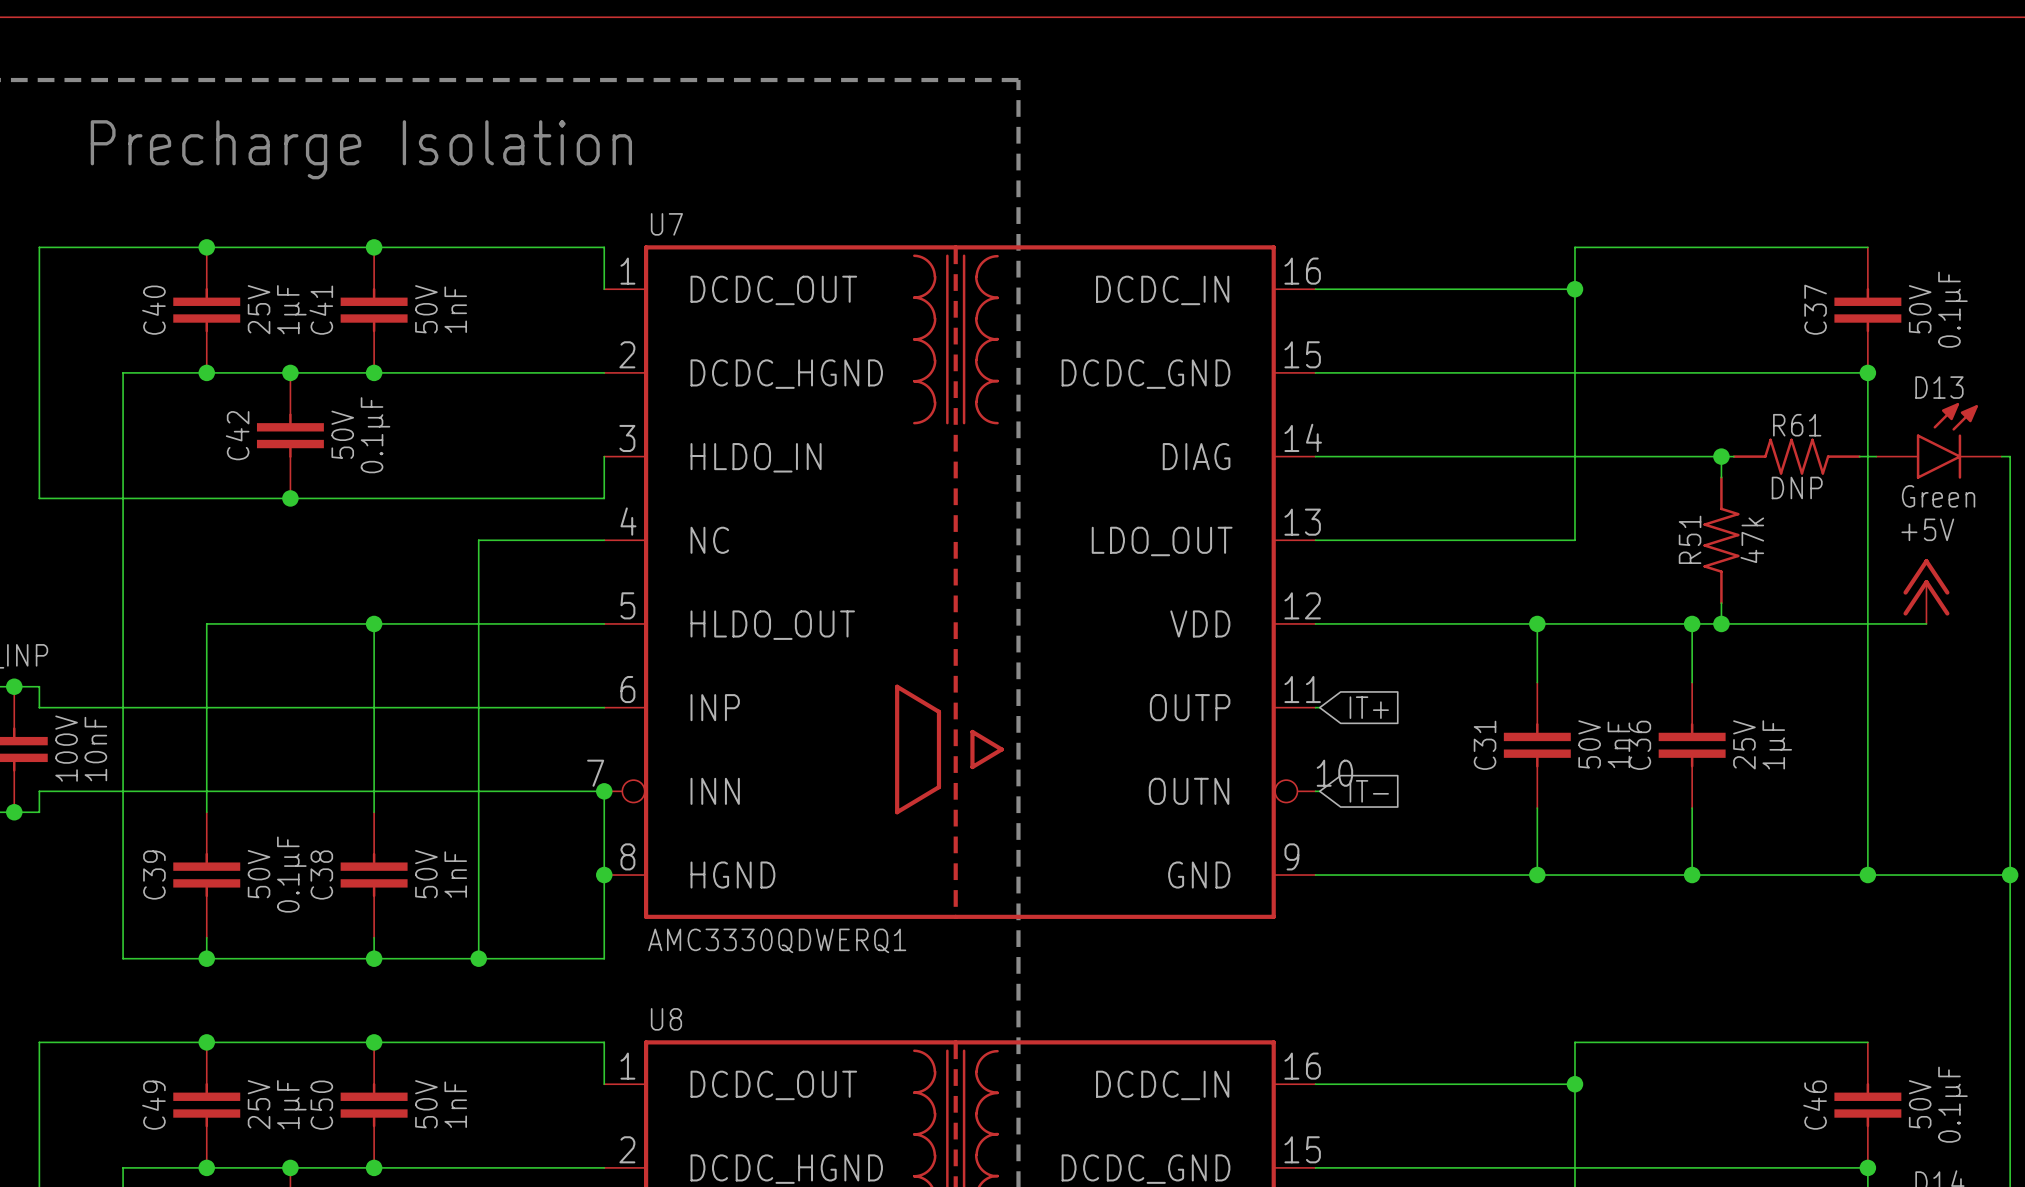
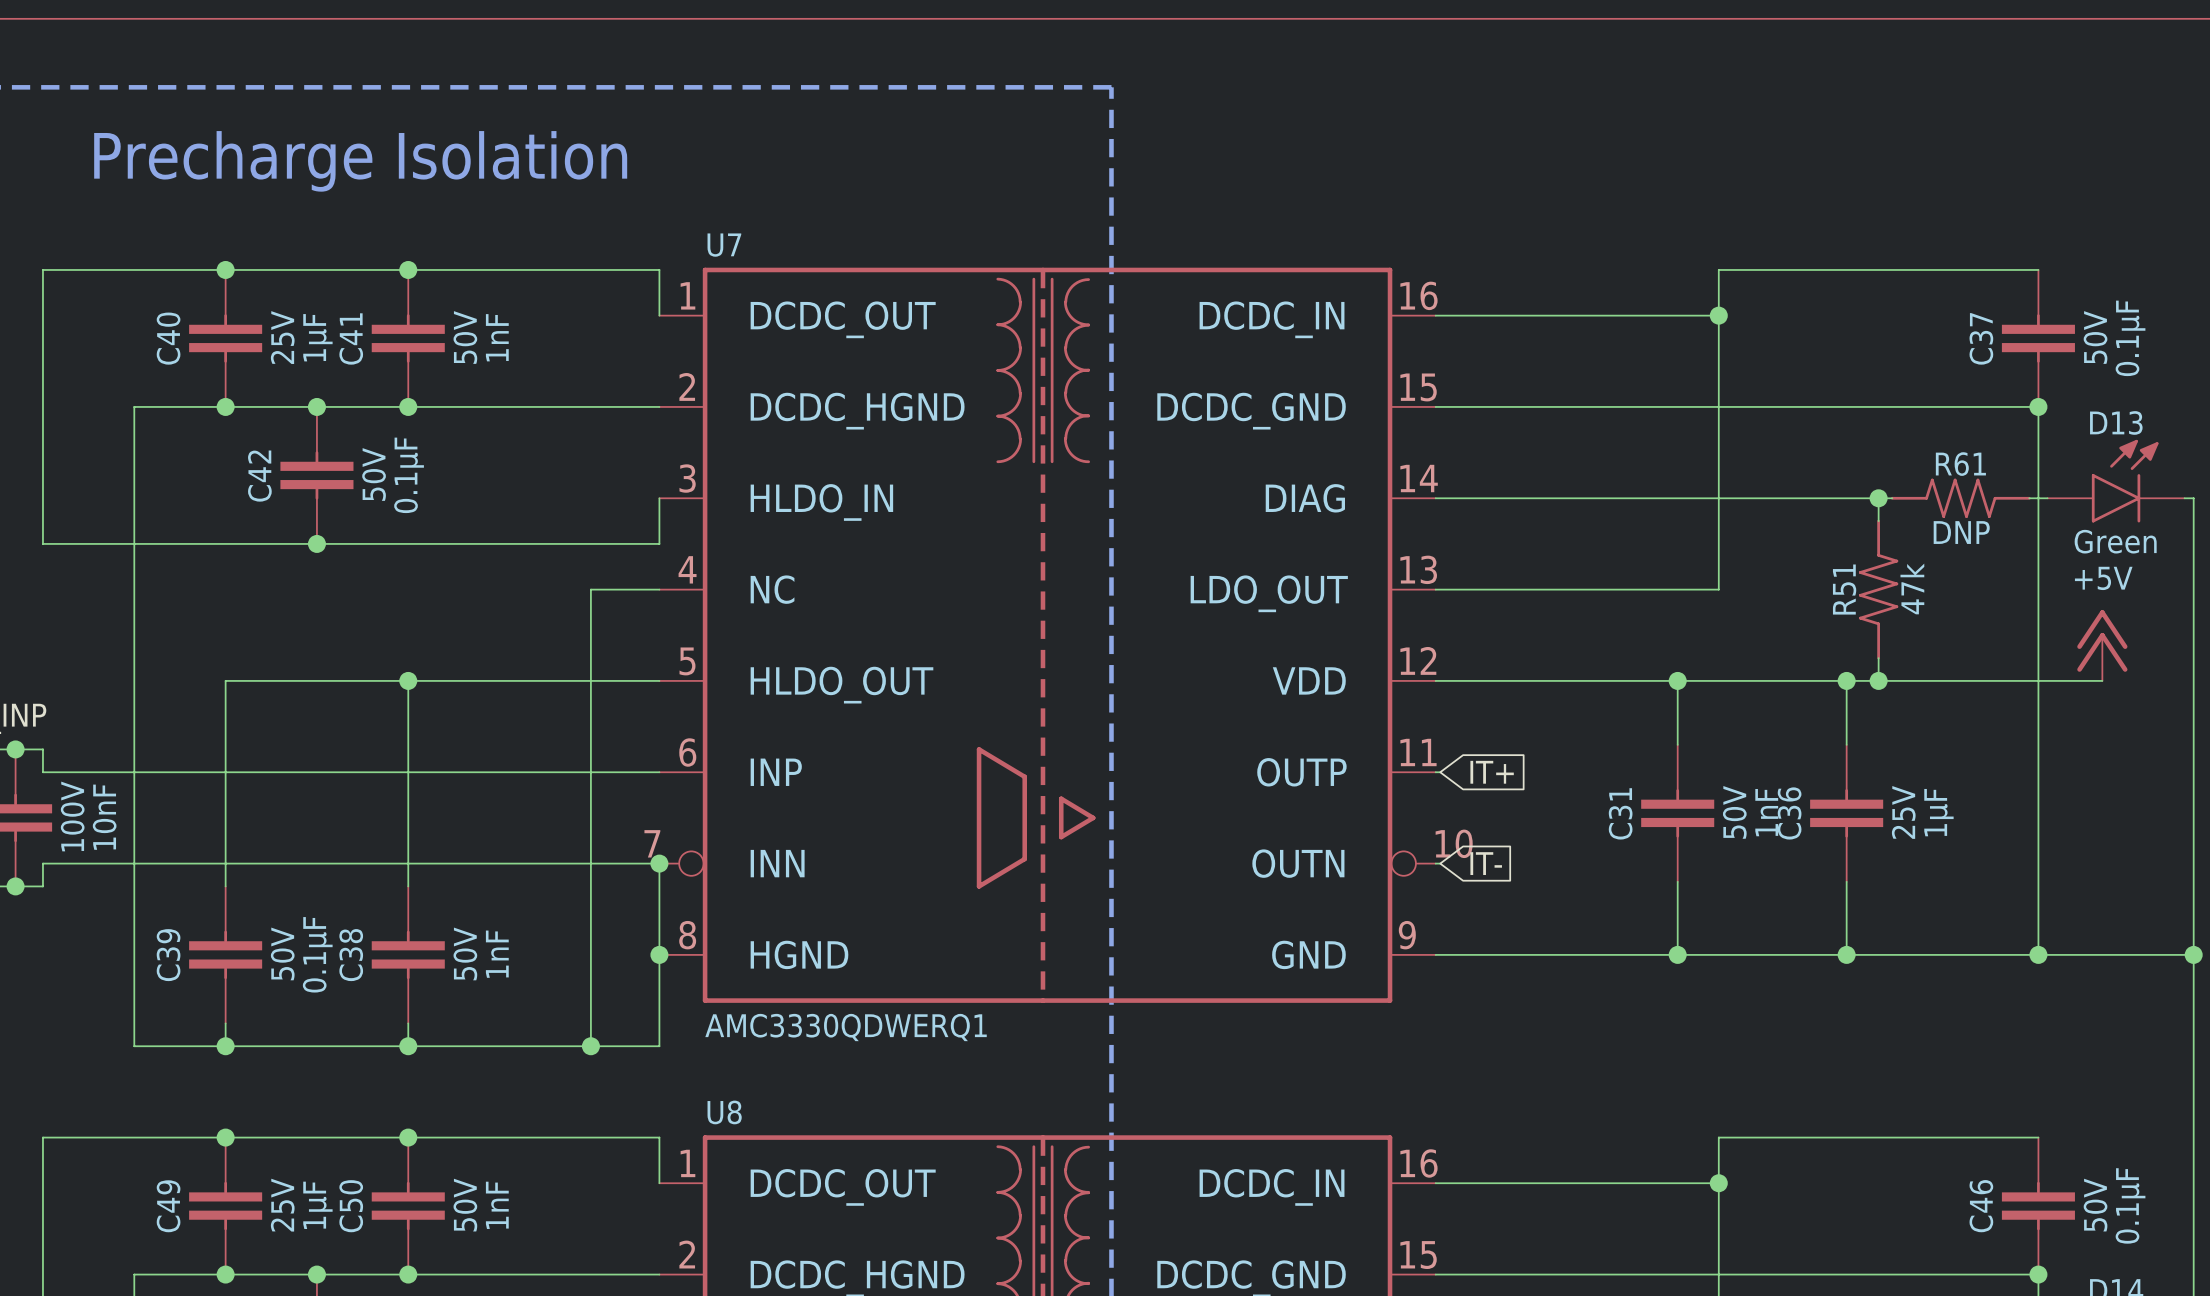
wire: (541, 540) (478, 540) (478, 958) -> (590, 589) (590, 1046)
junction position: (478, 958) -> (590, 1046)

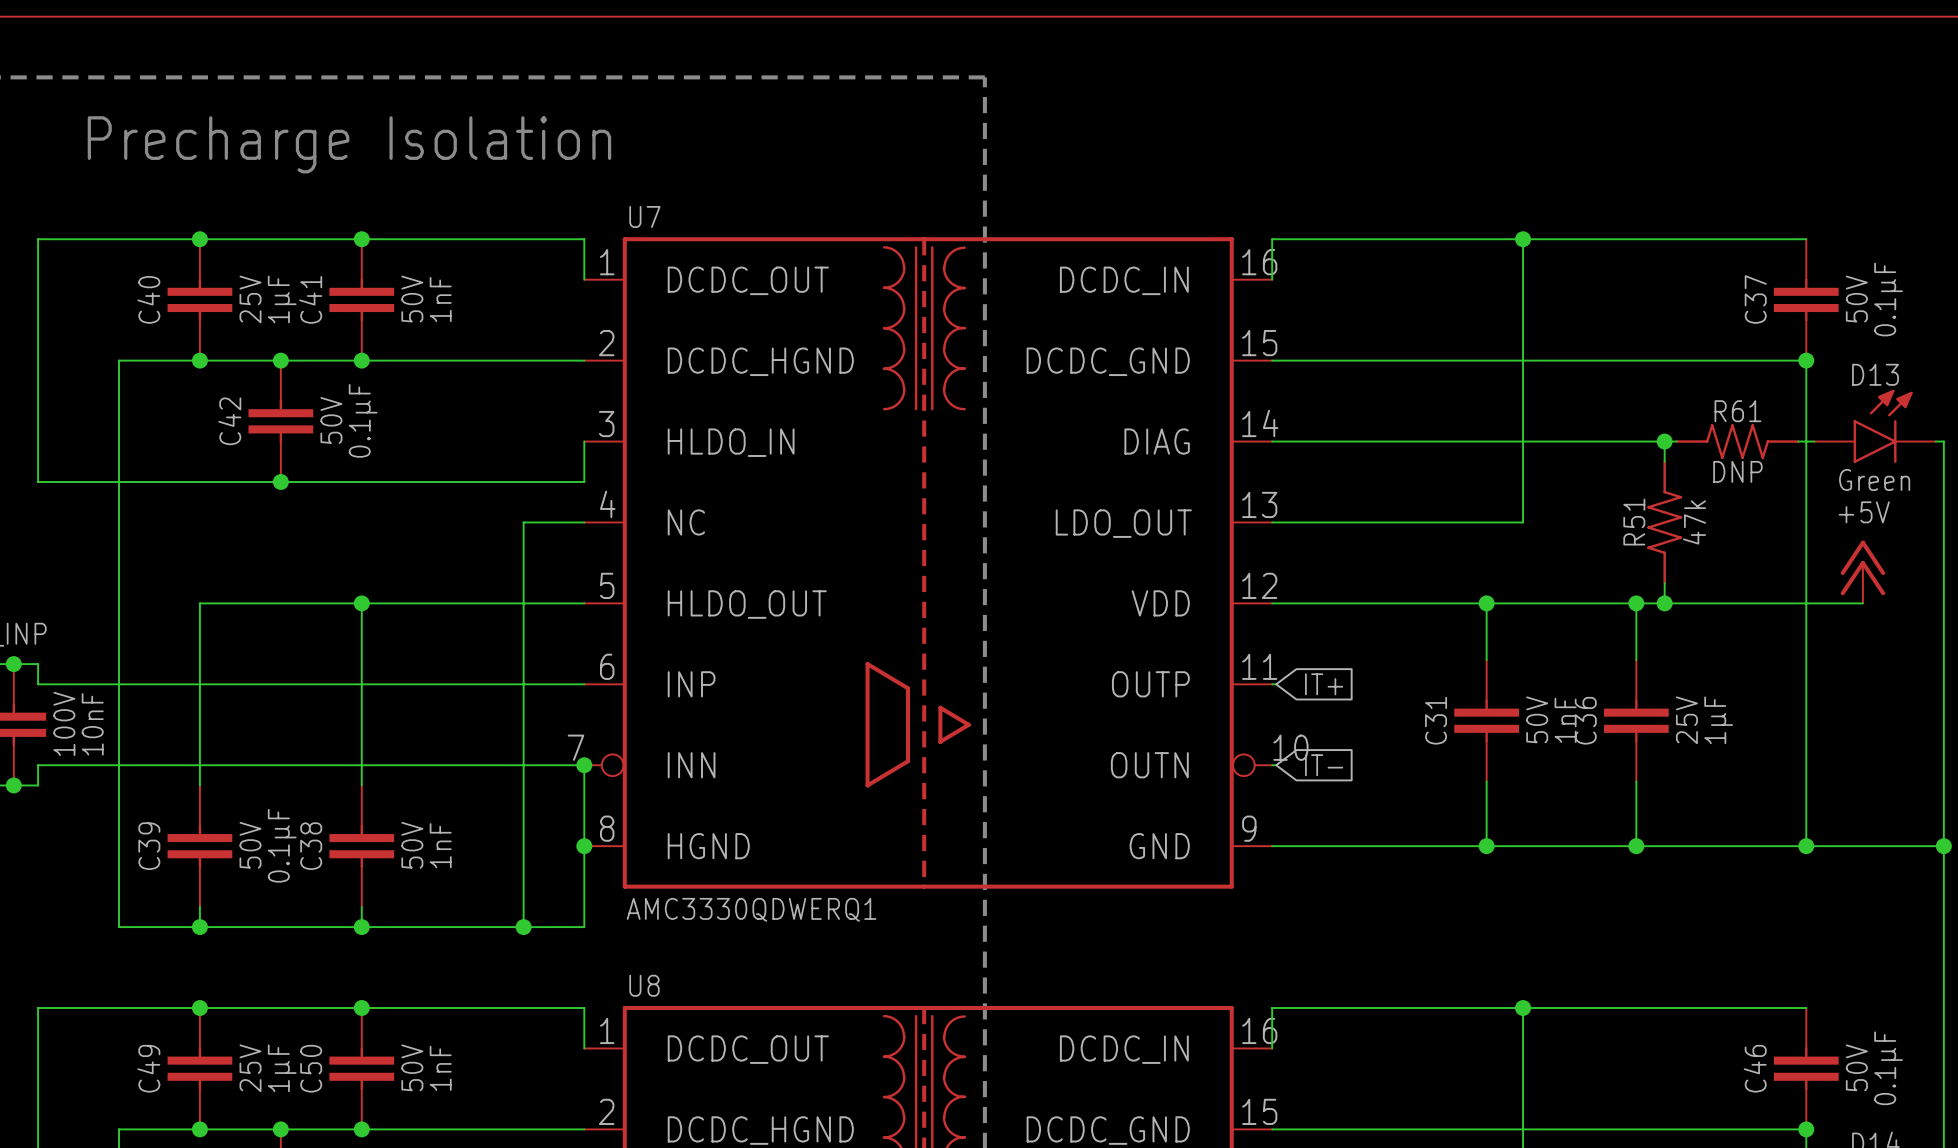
wire: (1435, 315) (1718, 315) -> (1272, 279) (1272, 239) (1523, 239)
junction position: (1718, 315) -> (1523, 239)
wire: (1435, 1183) (1718, 1183) -> (1272, 1048) (1272, 1008) (1523, 1008)
junction position: (1718, 1183) -> (1523, 1008)

